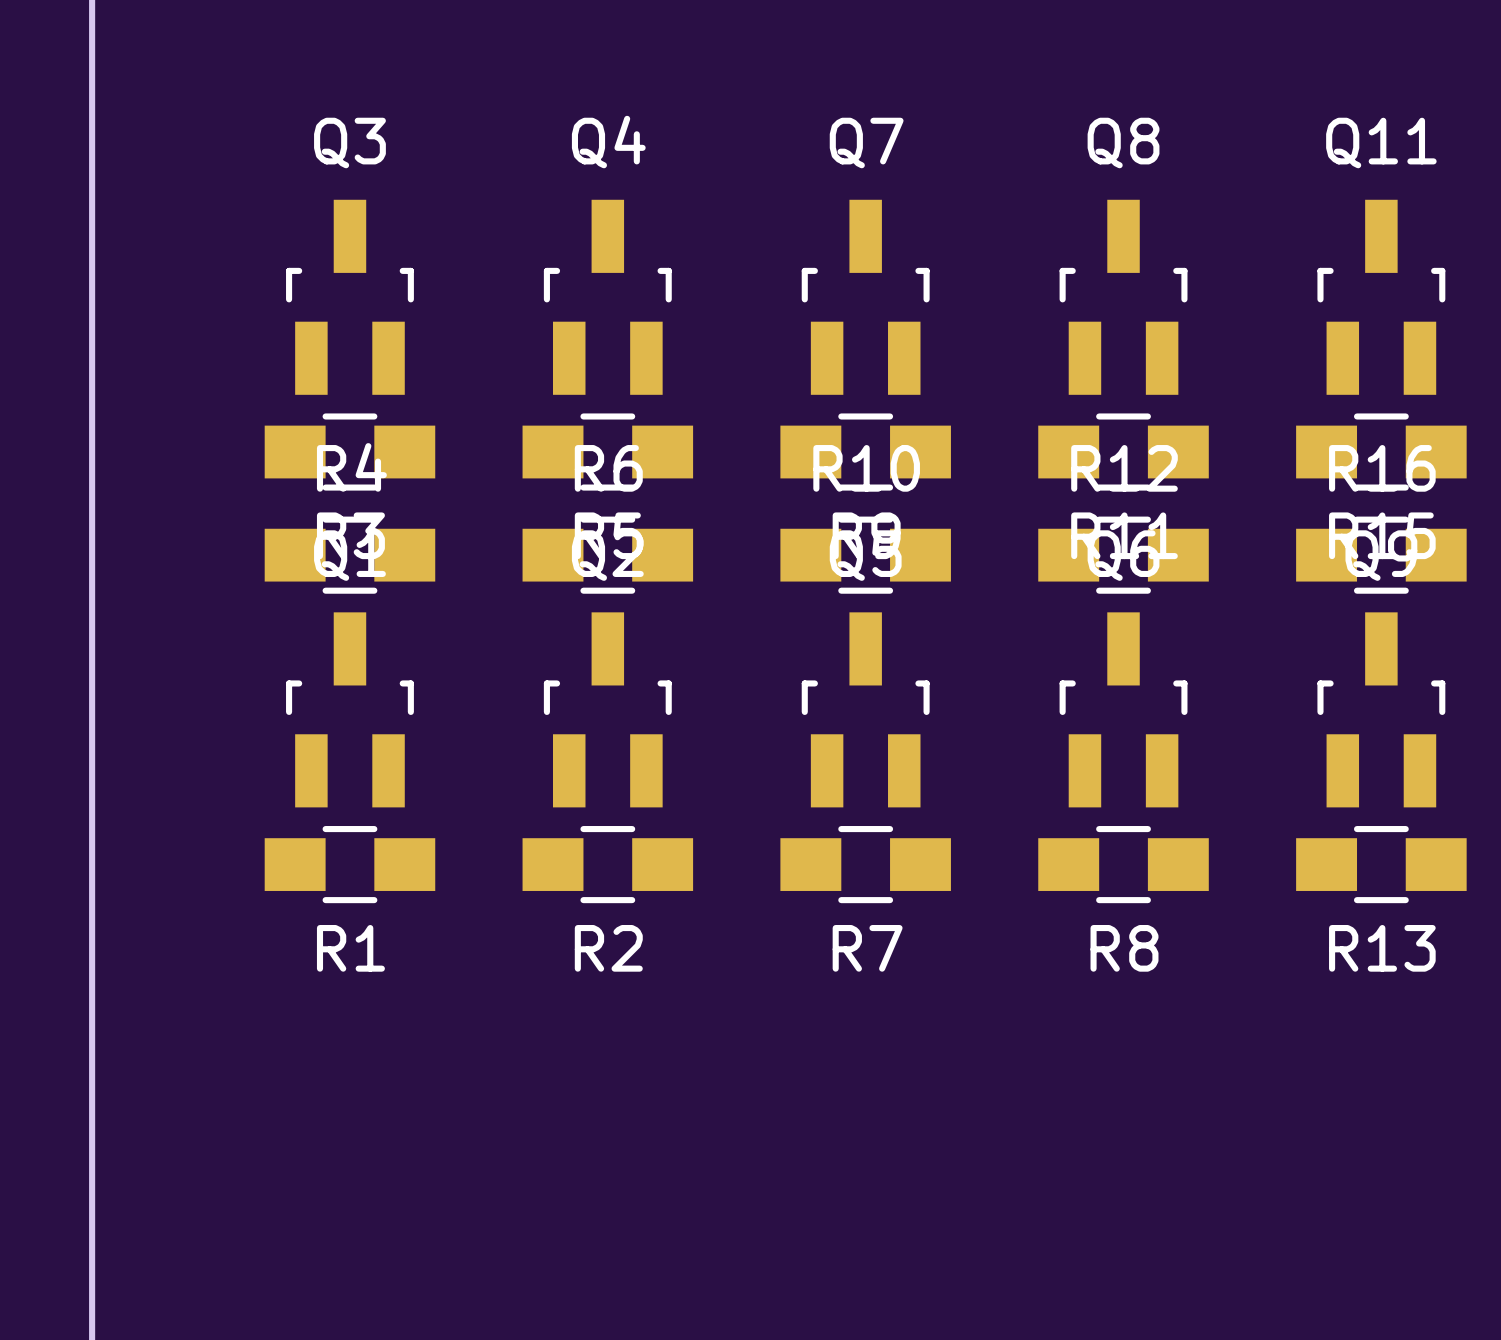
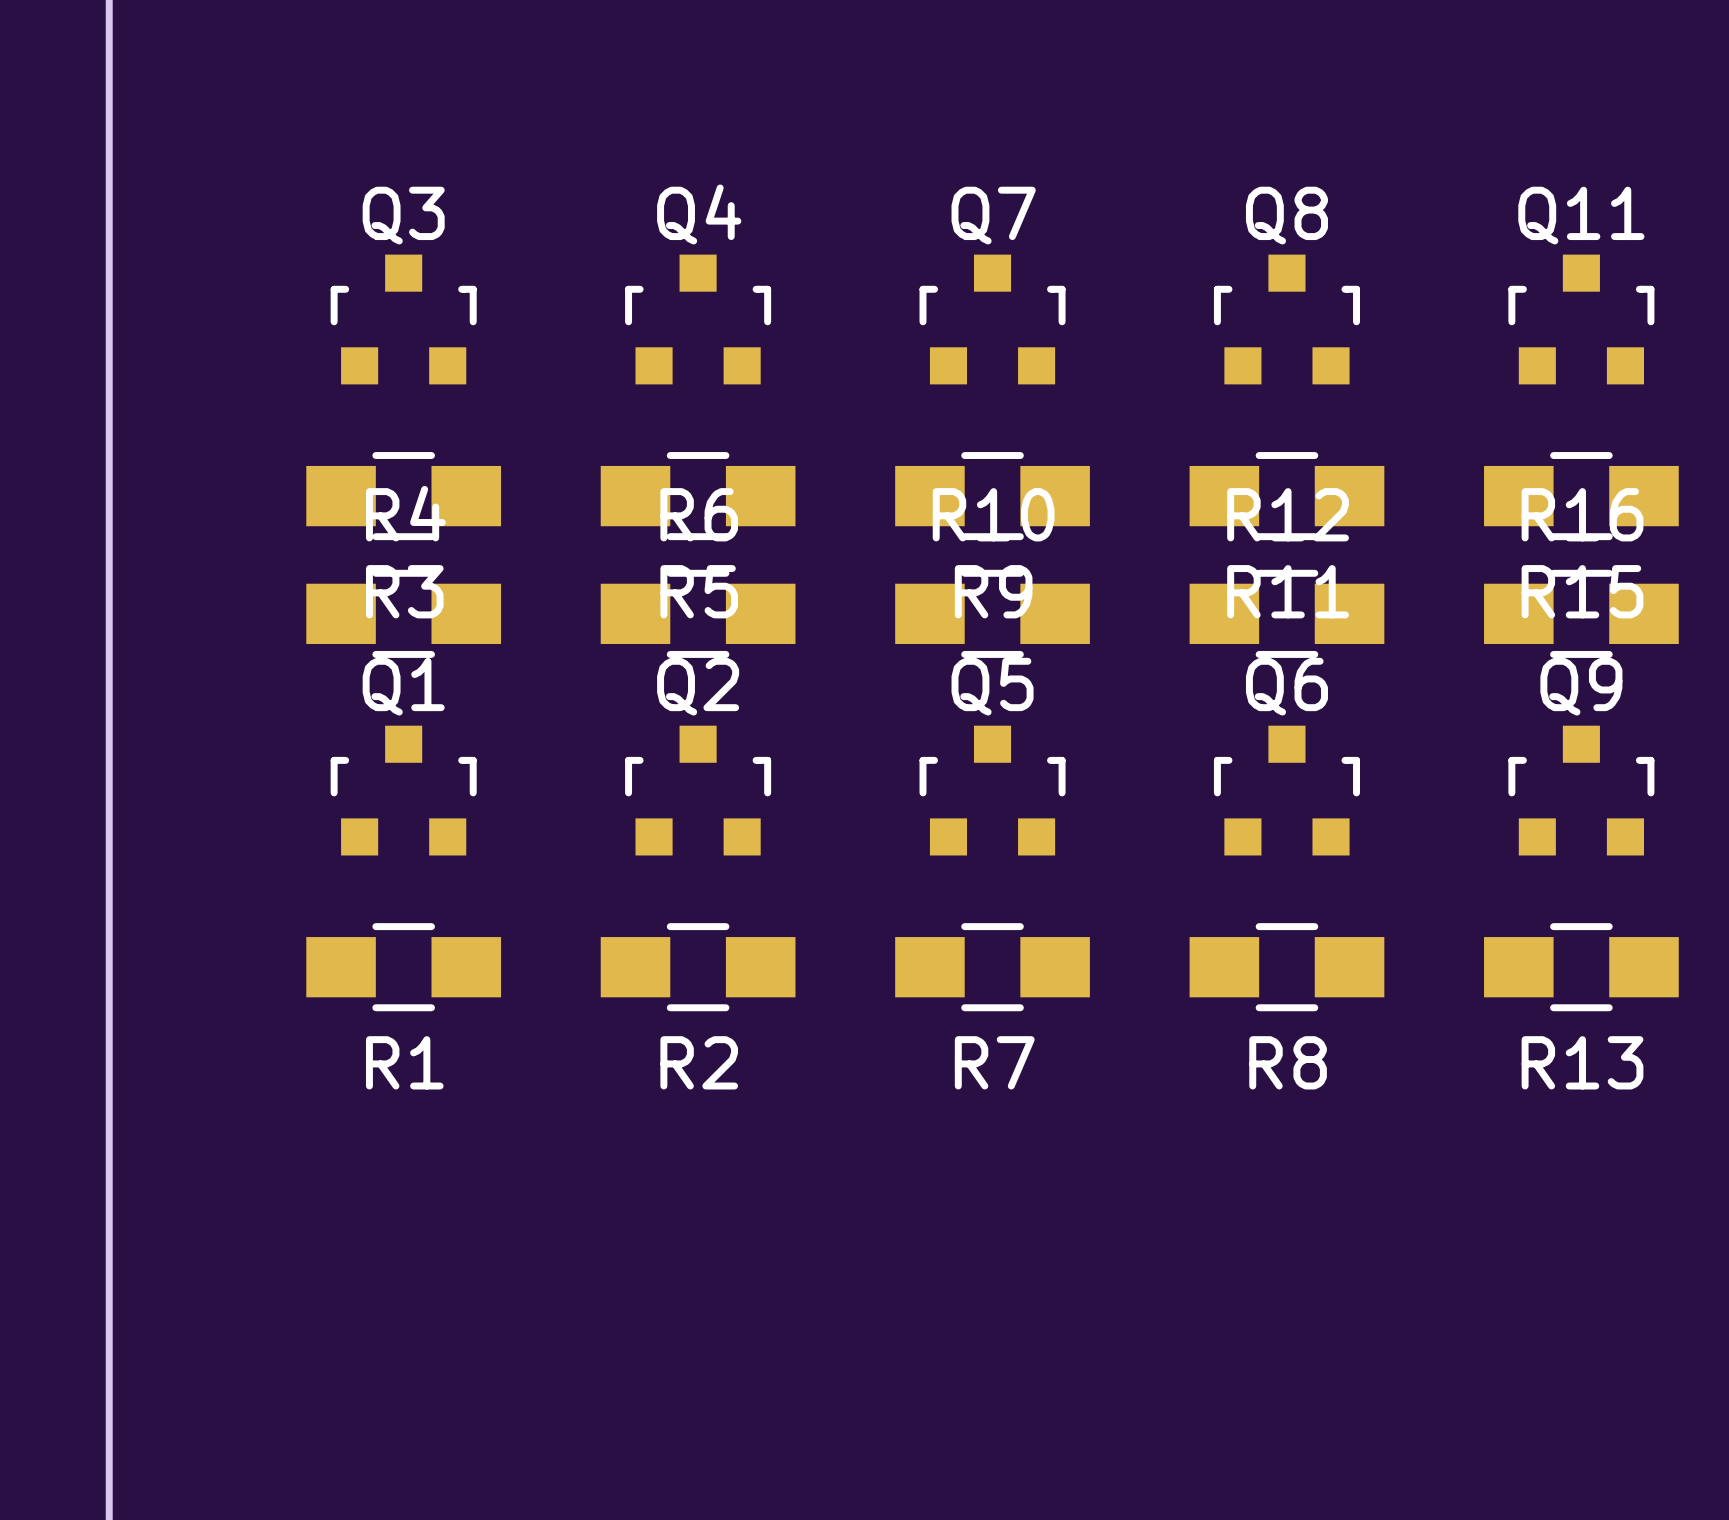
Q3 footprint: [286, 199, 414, 395] -> [330, 254, 477, 385]
Q4 footprint: [543, 199, 672, 395] -> [625, 254, 772, 385]
Q7 footprint: [801, 199, 930, 395] -> [919, 254, 1066, 385]
Q8 footprint: [1059, 199, 1188, 395] -> [1213, 254, 1360, 385]
Q11 footprint: [1317, 199, 1446, 395] -> [1508, 254, 1655, 385]
Q1 footprint: [286, 612, 414, 808] -> [330, 725, 477, 856]
Q2 footprint: [543, 612, 672, 808] -> [625, 725, 772, 856]
Q5 footprint: [801, 612, 930, 808] -> [919, 725, 1066, 856]
Q6 footprint: [1059, 612, 1188, 808] -> [1213, 725, 1360, 856]
Q9 footprint: [1317, 612, 1446, 808] -> [1508, 725, 1655, 856]

